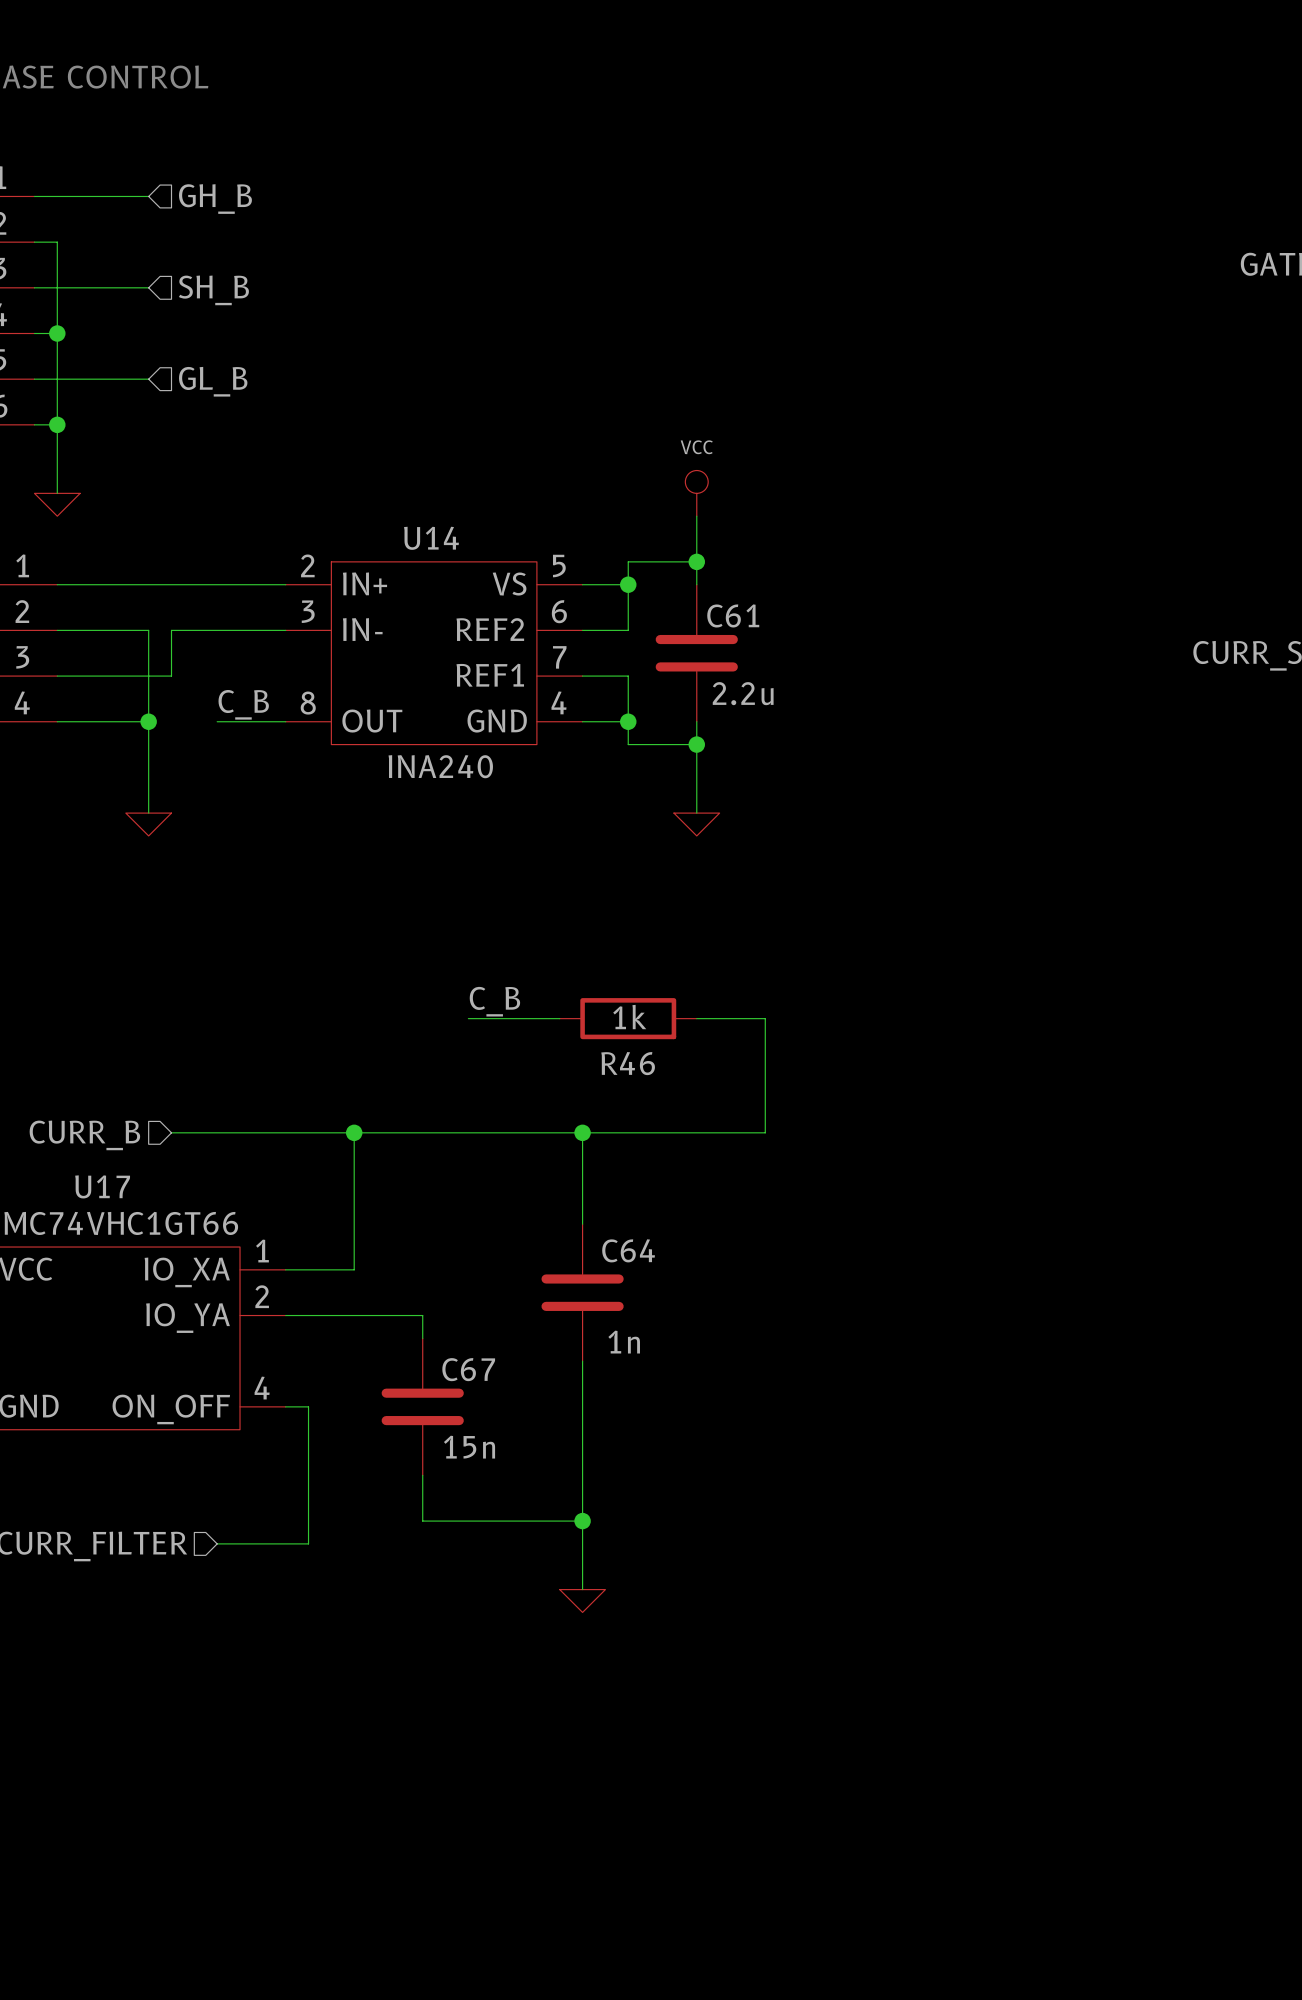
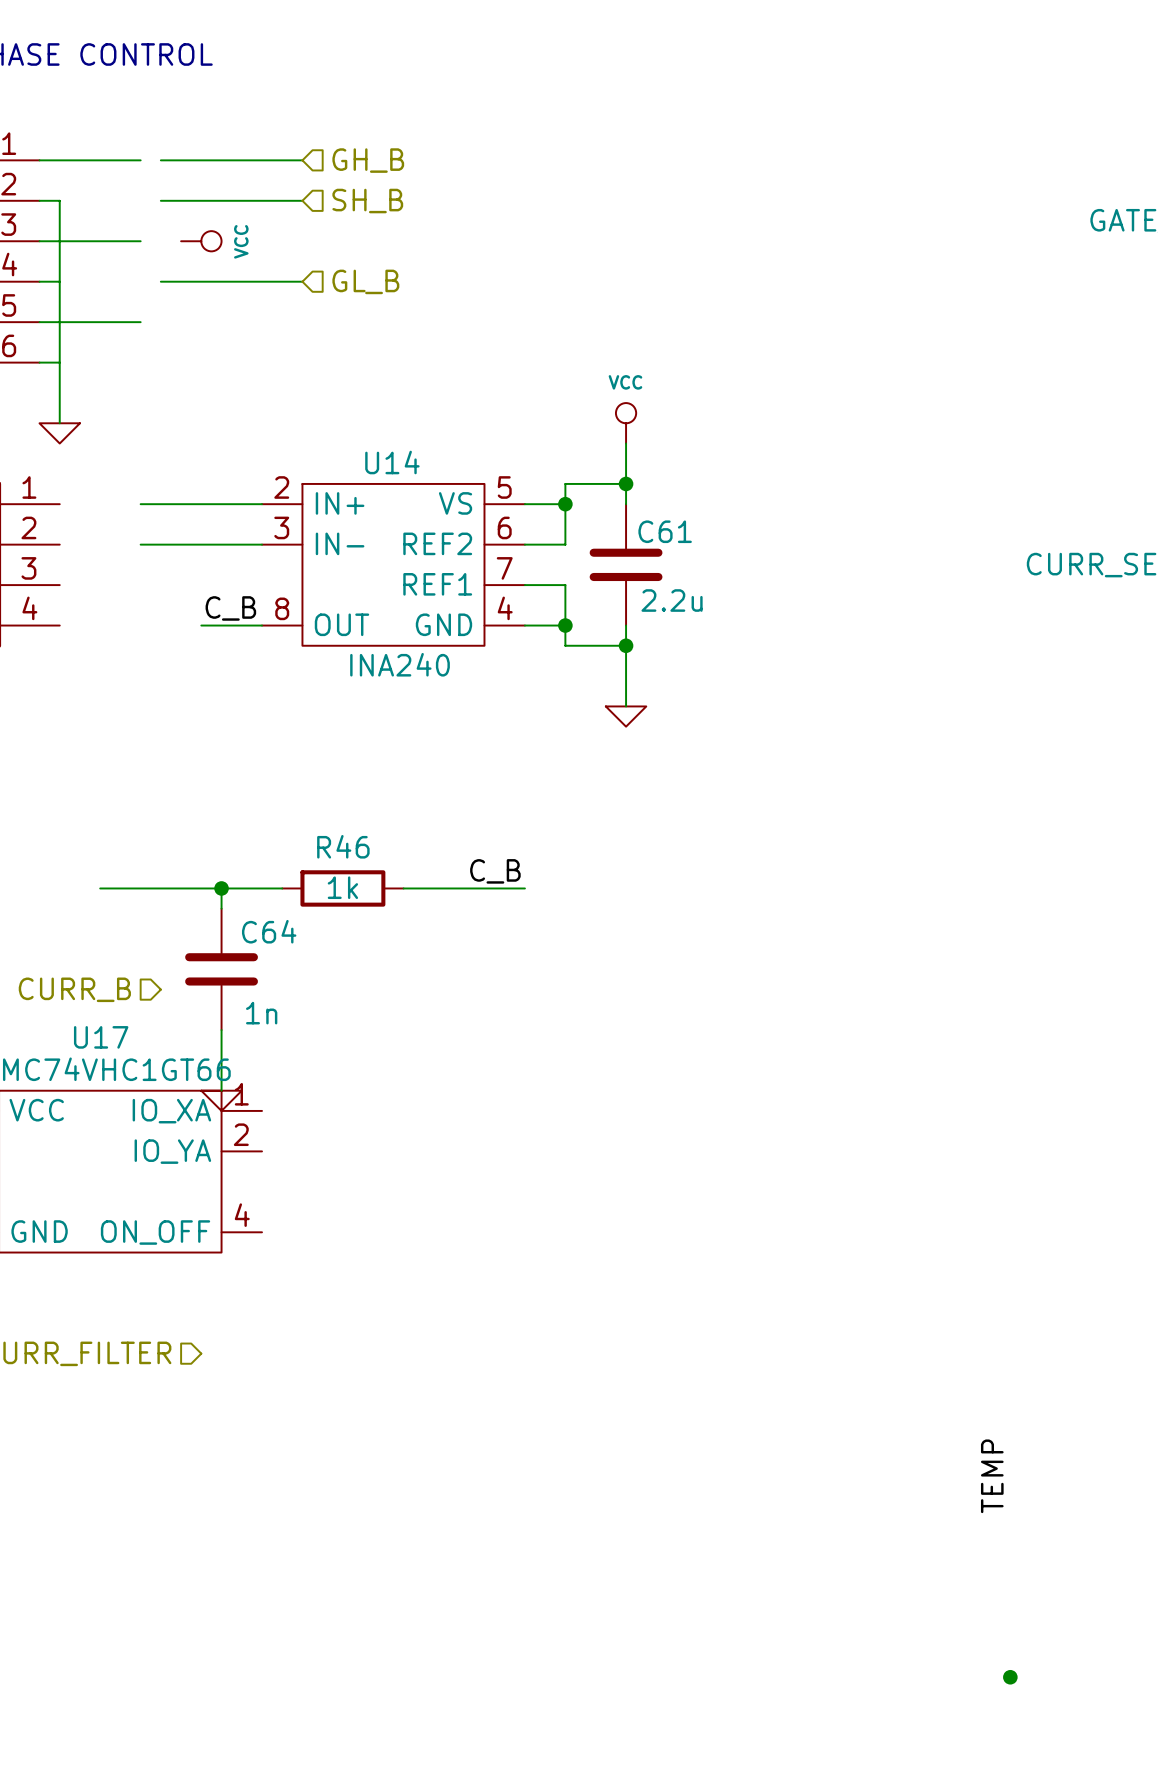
wire: none -> (160, 160) (302, 160)
hierarchical label position: GH_B (215, 199) -> GH_B (368, 160)
wire: none -> (160, 200) (302, 200)
power symbol: none -> VCC (201, 241)
hierarchical label position: SH_B (213, 290) -> SH_B (367, 201)
junction: (57, 333) -> none
wire: none -> (160, 281) (302, 281)
hierarchical label position: GL_B (213, 381) -> GL_B (365, 281)
junction: (57, 424) -> none
wire: (57, 584) (148, 584) -> none
wire: (57, 630) (148, 630) (148, 813) -> none
wire: (171, 630) (171, 676) (57, 676) -> (160, 544) (140, 544)
wire: (57, 721) (148, 721) -> none
junction: (148, 721) -> none
power symbol: (148, 824) -> none
label position: C_B (494, 1001) -> C_B (495, 871)
wire: none -> (100, 888) (282, 888)
wire: none -> (221, 888) (221, 908)
junction: none -> (221, 888)
wire: none -> (403, 888) (423, 888)
R46 position: (628, 1018) -> (342, 888)
wire: (696, 1018) (765, 1018) (765, 1132) (171, 1132) -> none
R46 name position: R46 (628, 1063) -> R46 (343, 846)
wire: (354, 1132) (354, 1269) (285, 1269) -> none
junction: (354, 1132) -> none
wire: (582, 1132) (582, 1224) -> none
junction: (582, 1132) -> none
wire: none -> (221, 1030) (221, 1090)
power symbol: none -> (221, 1100)
C64 position: (582, 1292) -> (221, 969)
wire: (285, 1315) (422, 1315) (422, 1338) -> none
wire: (582, 1361) (582, 1589) -> none
wire: (285, 1406) (308, 1406) (308, 1543) (217, 1543) -> none
C67: 15n (422, 1406) -> none
wire: (422, 1475) (422, 1521) (582, 1521) -> none
junction: (582, 1521) -> none
power symbol: (582, 1601) -> none
label: none -> TEMP (992, 1476)
junction: none -> (1010, 1677)

